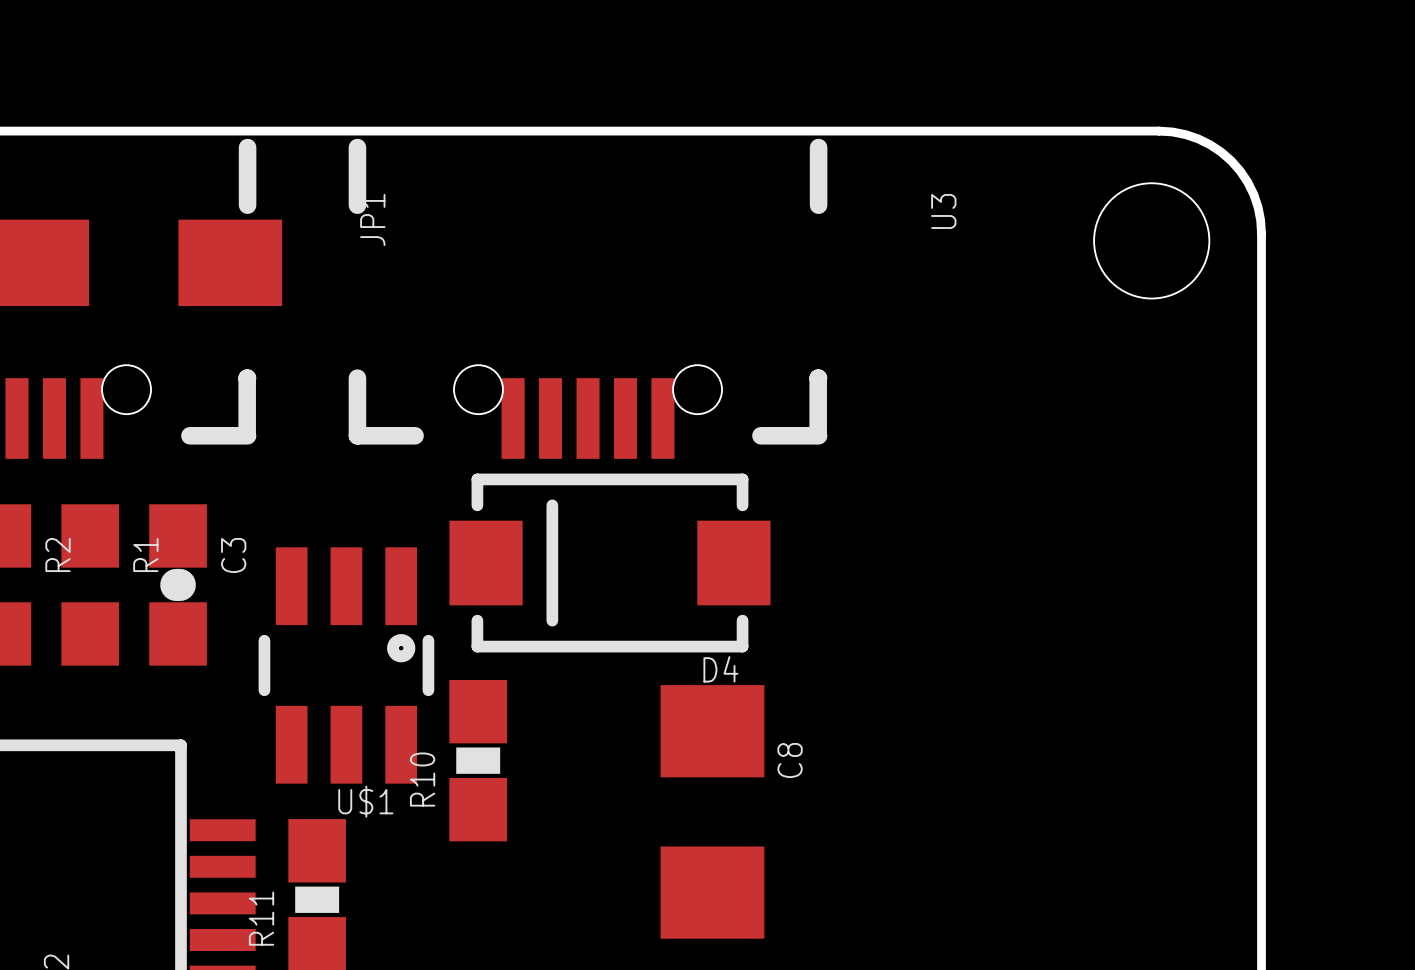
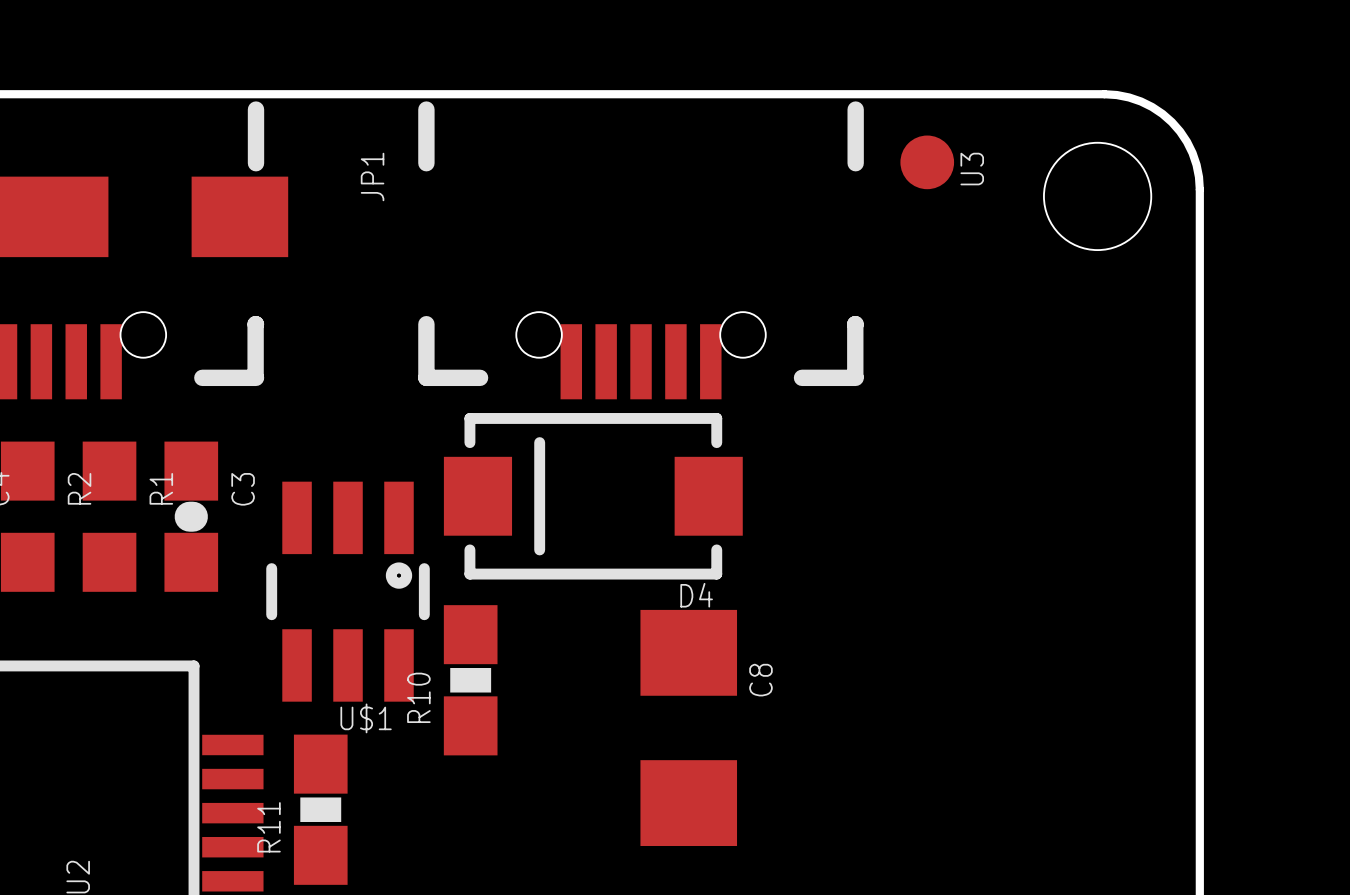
part: none -> (927, 162)
U3 position: (588, 298) -> (641, 250)

